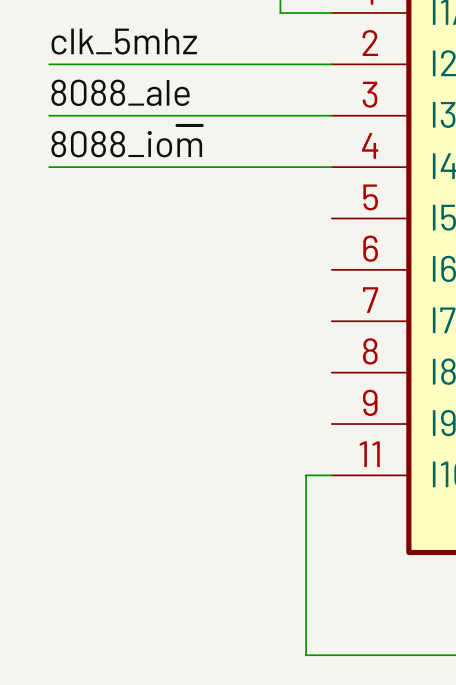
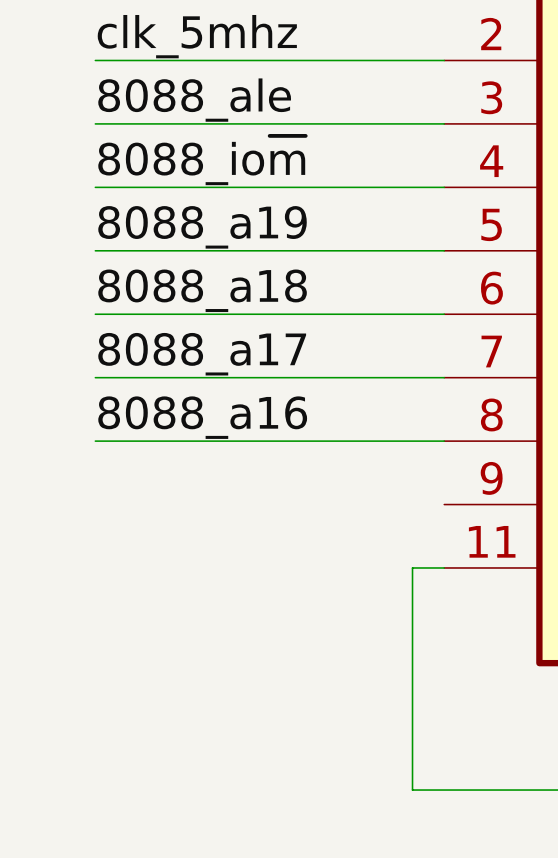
label: none -> 8088_a19 (202, 227)
wire: none -> (95, 250) (444, 250)
label: none -> 8088_a18 (202, 290)
wire: none -> (95, 314) (444, 314)
label: none -> 8088_a17 (202, 354)
wire: none -> (95, 377) (444, 377)
label: none -> 8088_a16 (202, 417)
wire: none -> (95, 441) (444, 441)

